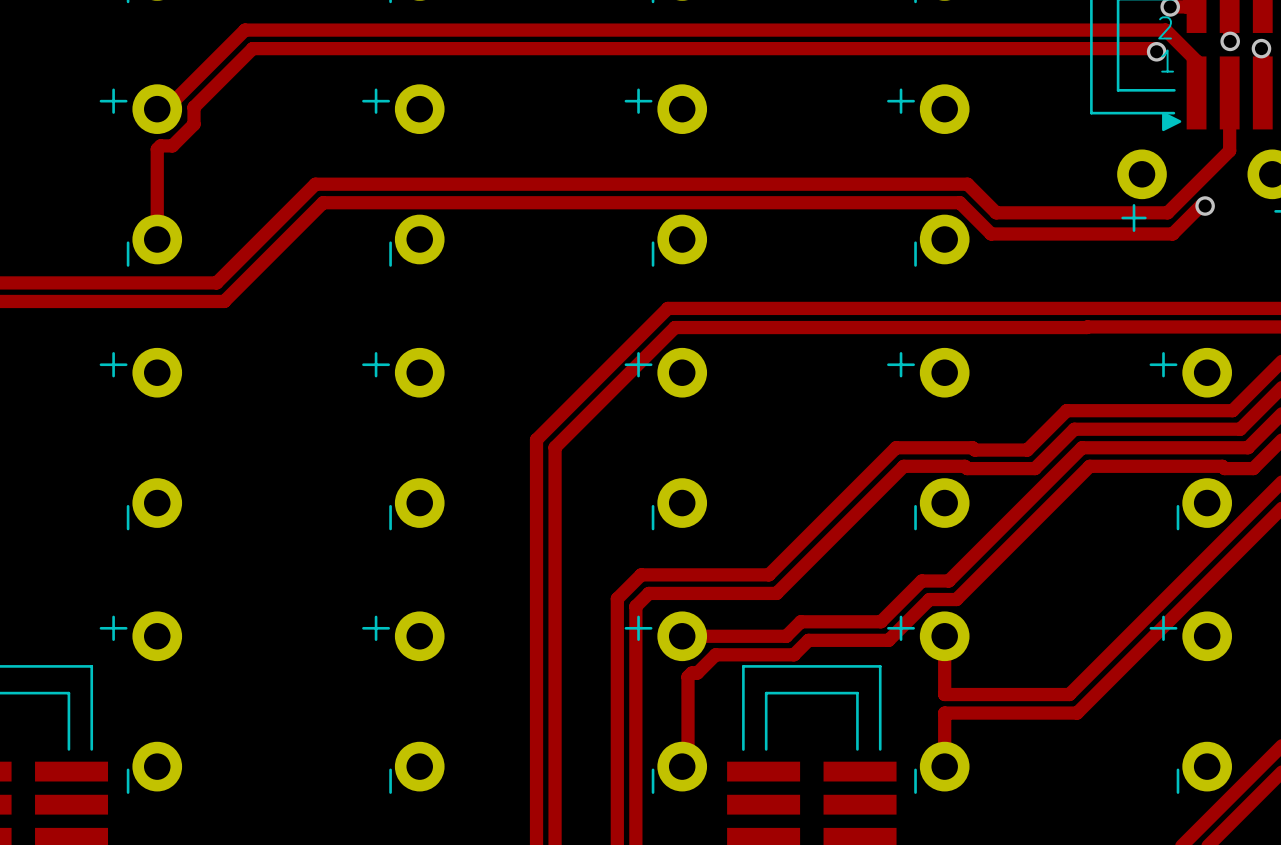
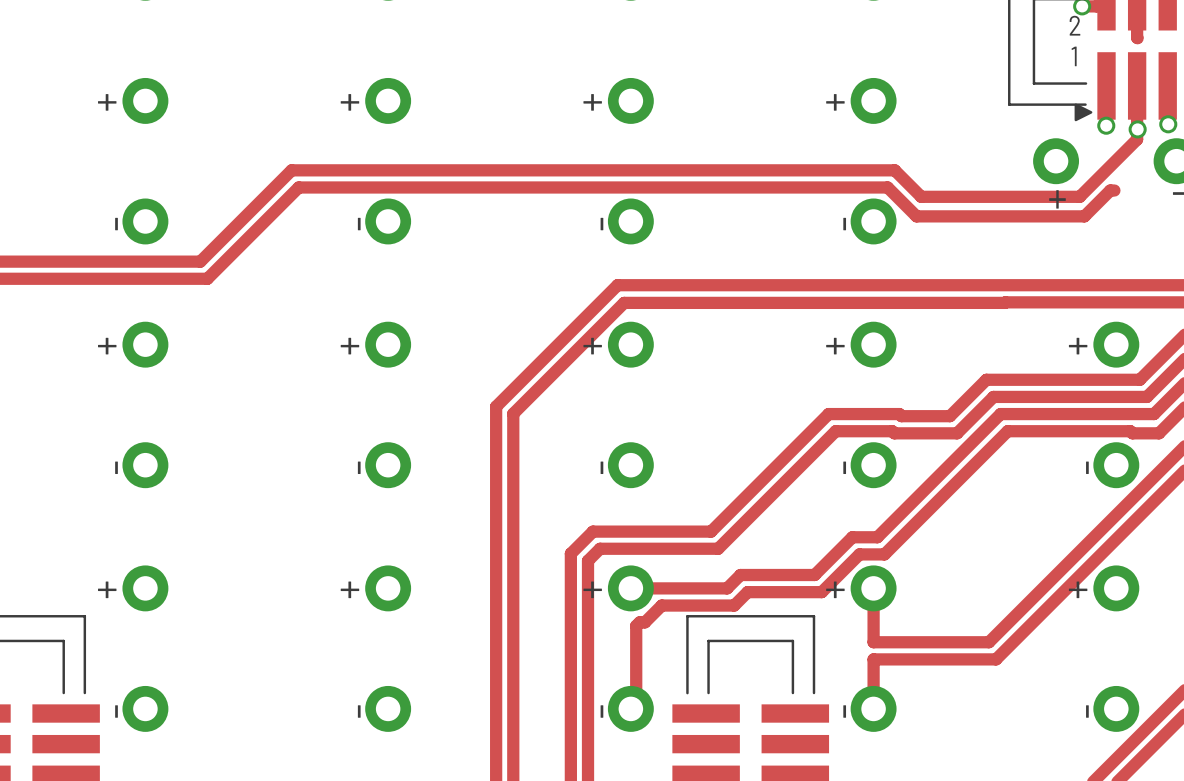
via: (1230, 41) -> none
via: (1261, 48) -> none
track: (1156, 51) (1153, 48) (252, 48) (193, 107) (193, 124) (172, 145) (160, 145) (157, 149) (157, 239) -> none
via: (1156, 51) -> none
track: (1196, 92) (1196, 61) (1165, 30) (245, 30) (165, 109) (157, 109) -> none
via: none -> (1168, 124)
via: none -> (1106, 125)
via: none -> (1137, 129)
via: (1205, 206) -> none

